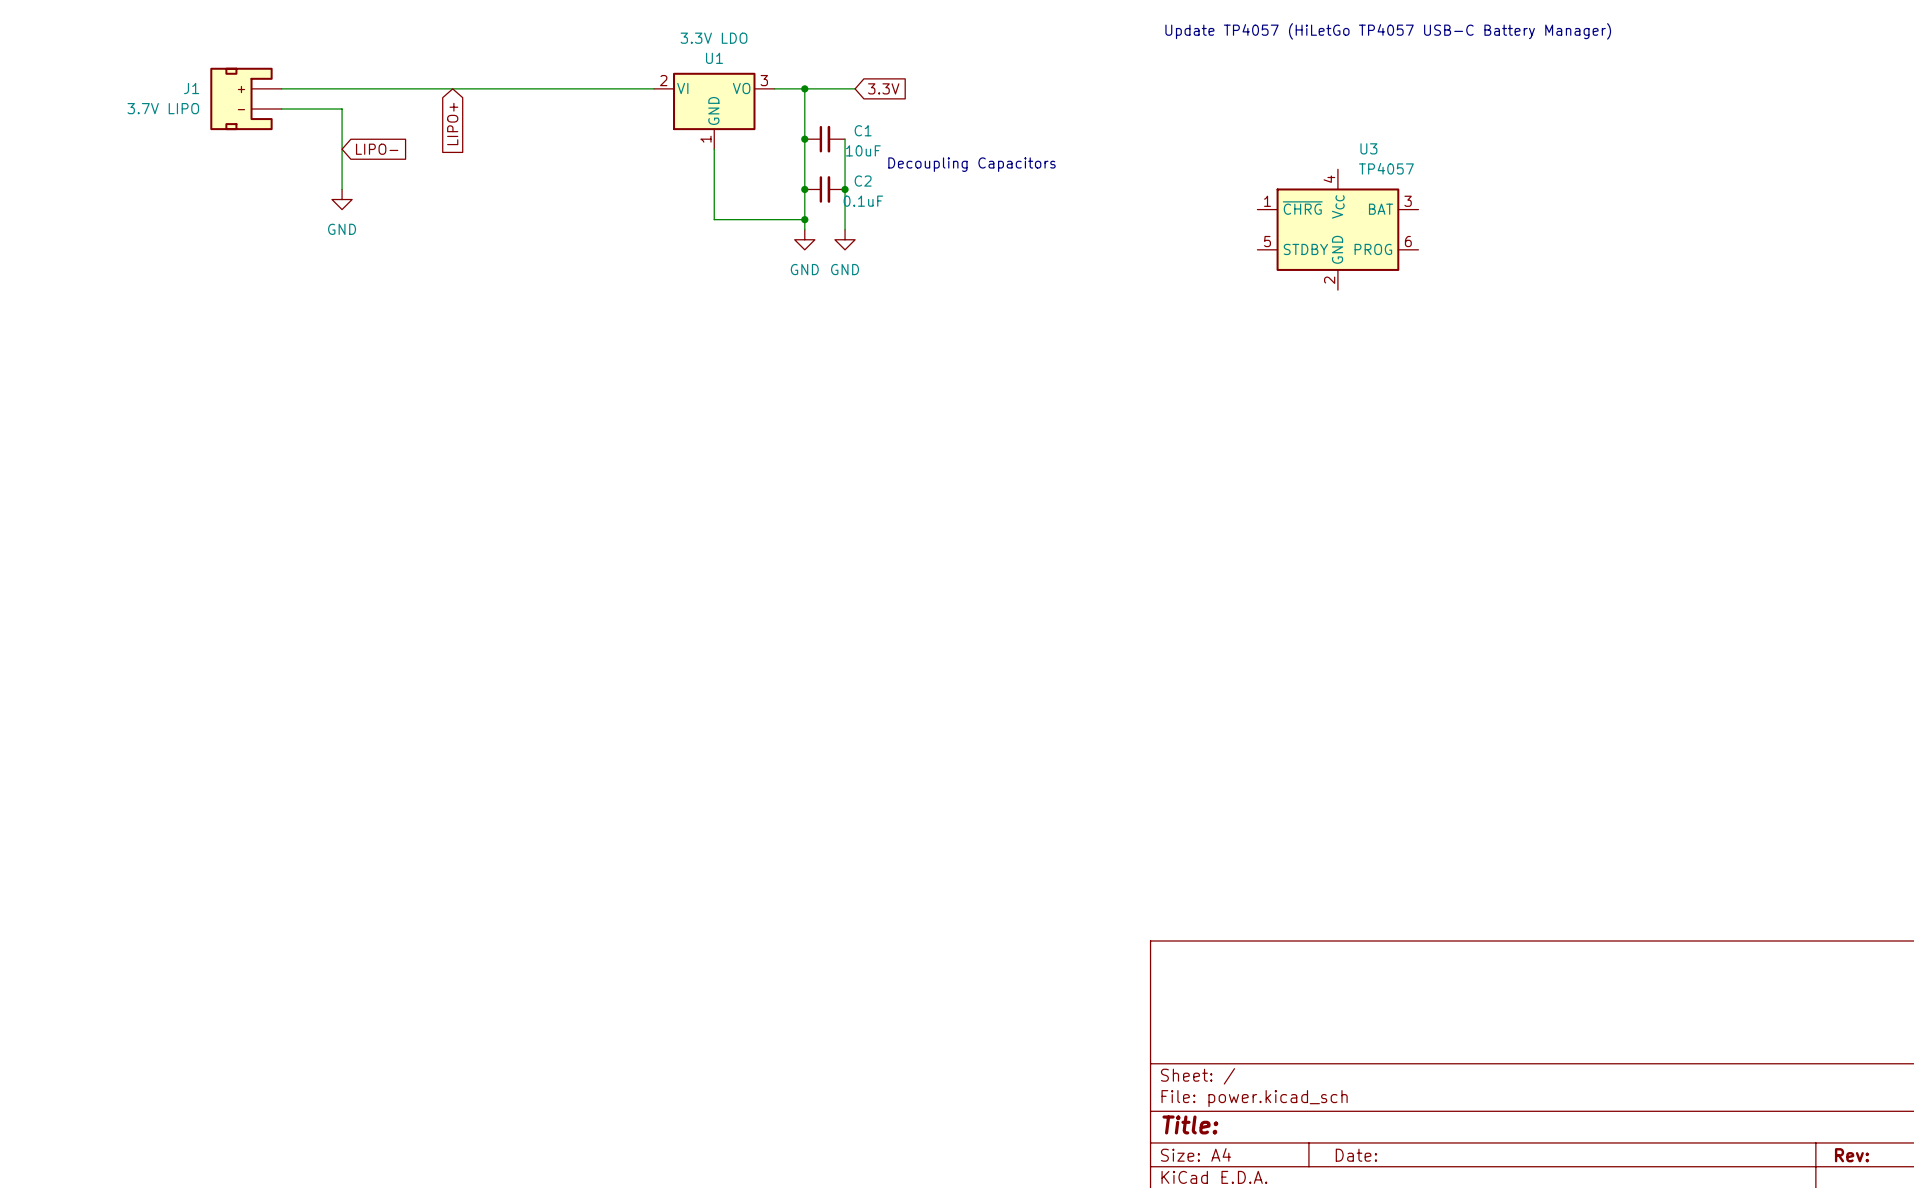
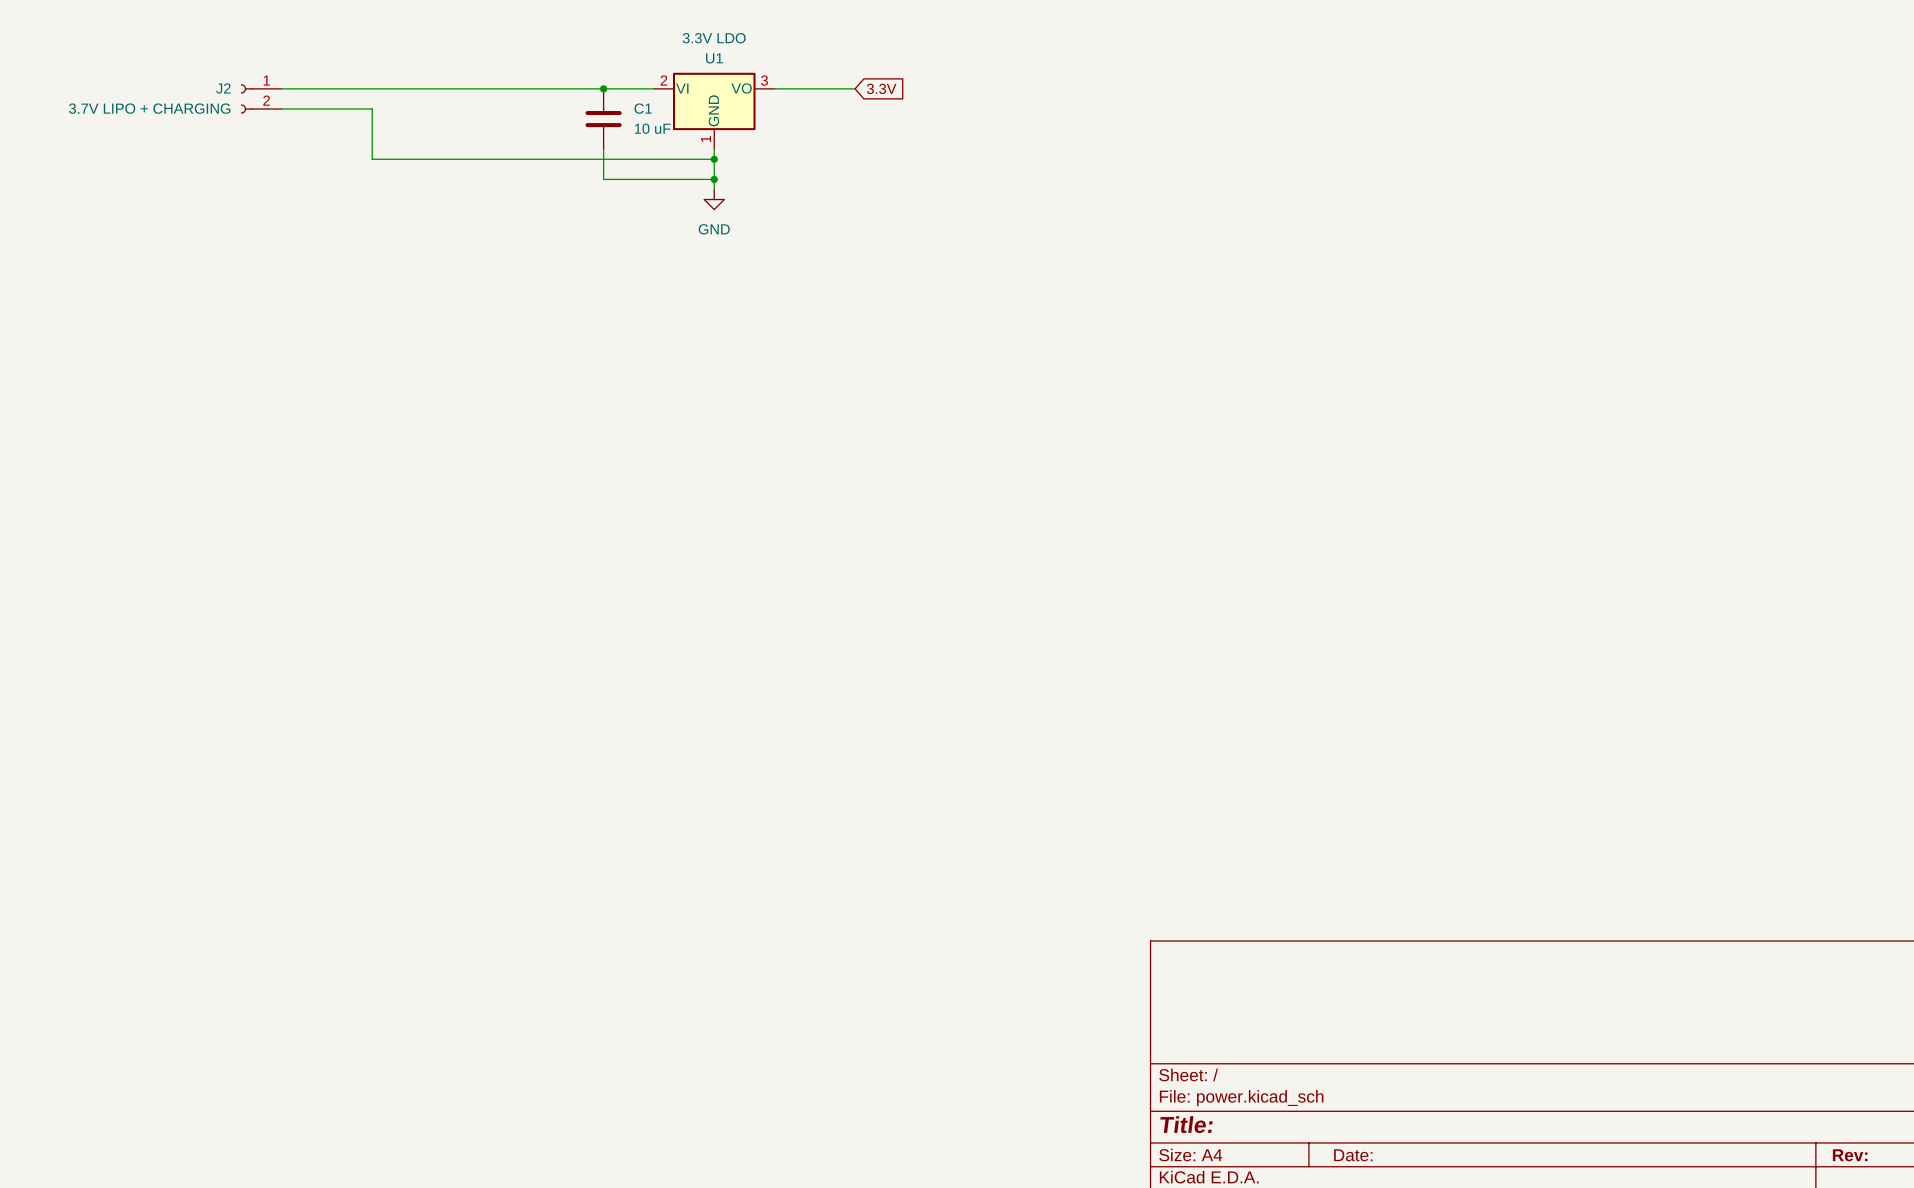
text: Update TP4057 (HiLetGo TP4057 USB-C Battery Manager) (1388, 31) -> none
junction: none -> (603, 88)
wire: (804, 88) (804, 229) -> none
junction: (804, 88) -> none
J1: 3.7V LIPO (245, 98) -> none
J2: none -> 3.7V LIPO + CHARGING (261, 98)
wire: (342, 109) (342, 189) -> (342, 109) (372, 109) (372, 159) (714, 159)
global label: LIPO+ (452, 123) -> none
C1 symbol: [804, 125, 846, 153] -> [585, 88, 622, 150]
junction: (804, 139) -> none
wire: (845, 139) (845, 229) -> none
global label: LIPO- (377, 149) -> none
wire: none -> (603, 149) (603, 179) (714, 179)
C1 value: 10uF (863, 150) -> 10 uF (652, 128)
junction: none -> (714, 159)
text: Decoupling Capacitors (972, 164) -> none
junction: none -> (714, 179)
wire: (714, 189) (714, 219) (804, 219) -> none
junction: (804, 189) -> none
C2: 0.1uF (824, 189) -> none
junction: (845, 189) -> none
power symbol: GND (342, 199) -> none
power symbol: none -> GND (714, 199)
junction: (804, 219) -> none
U3: TP4057 (1337, 229) -> none
power symbol: GND (804, 239) -> none
power symbol: GND (845, 239) -> none

